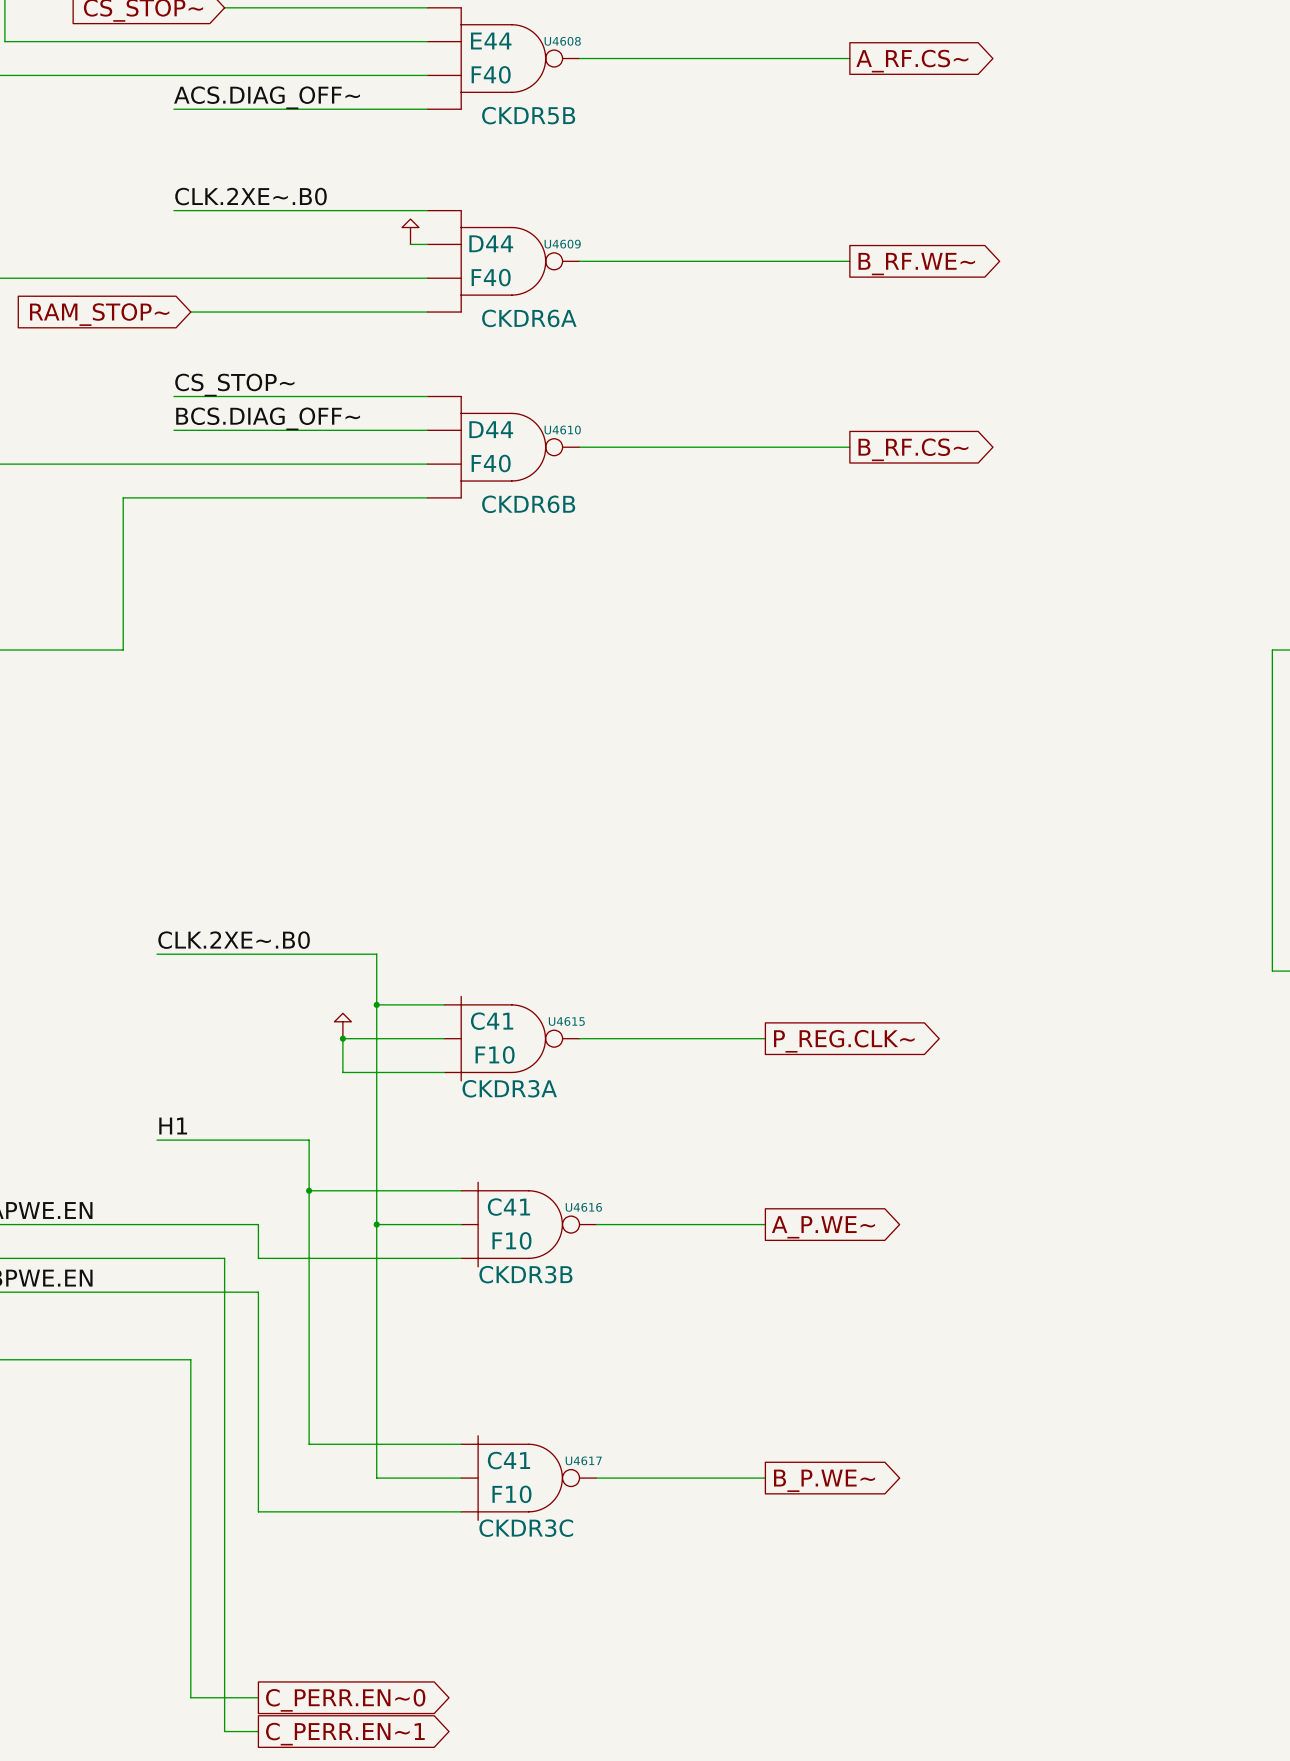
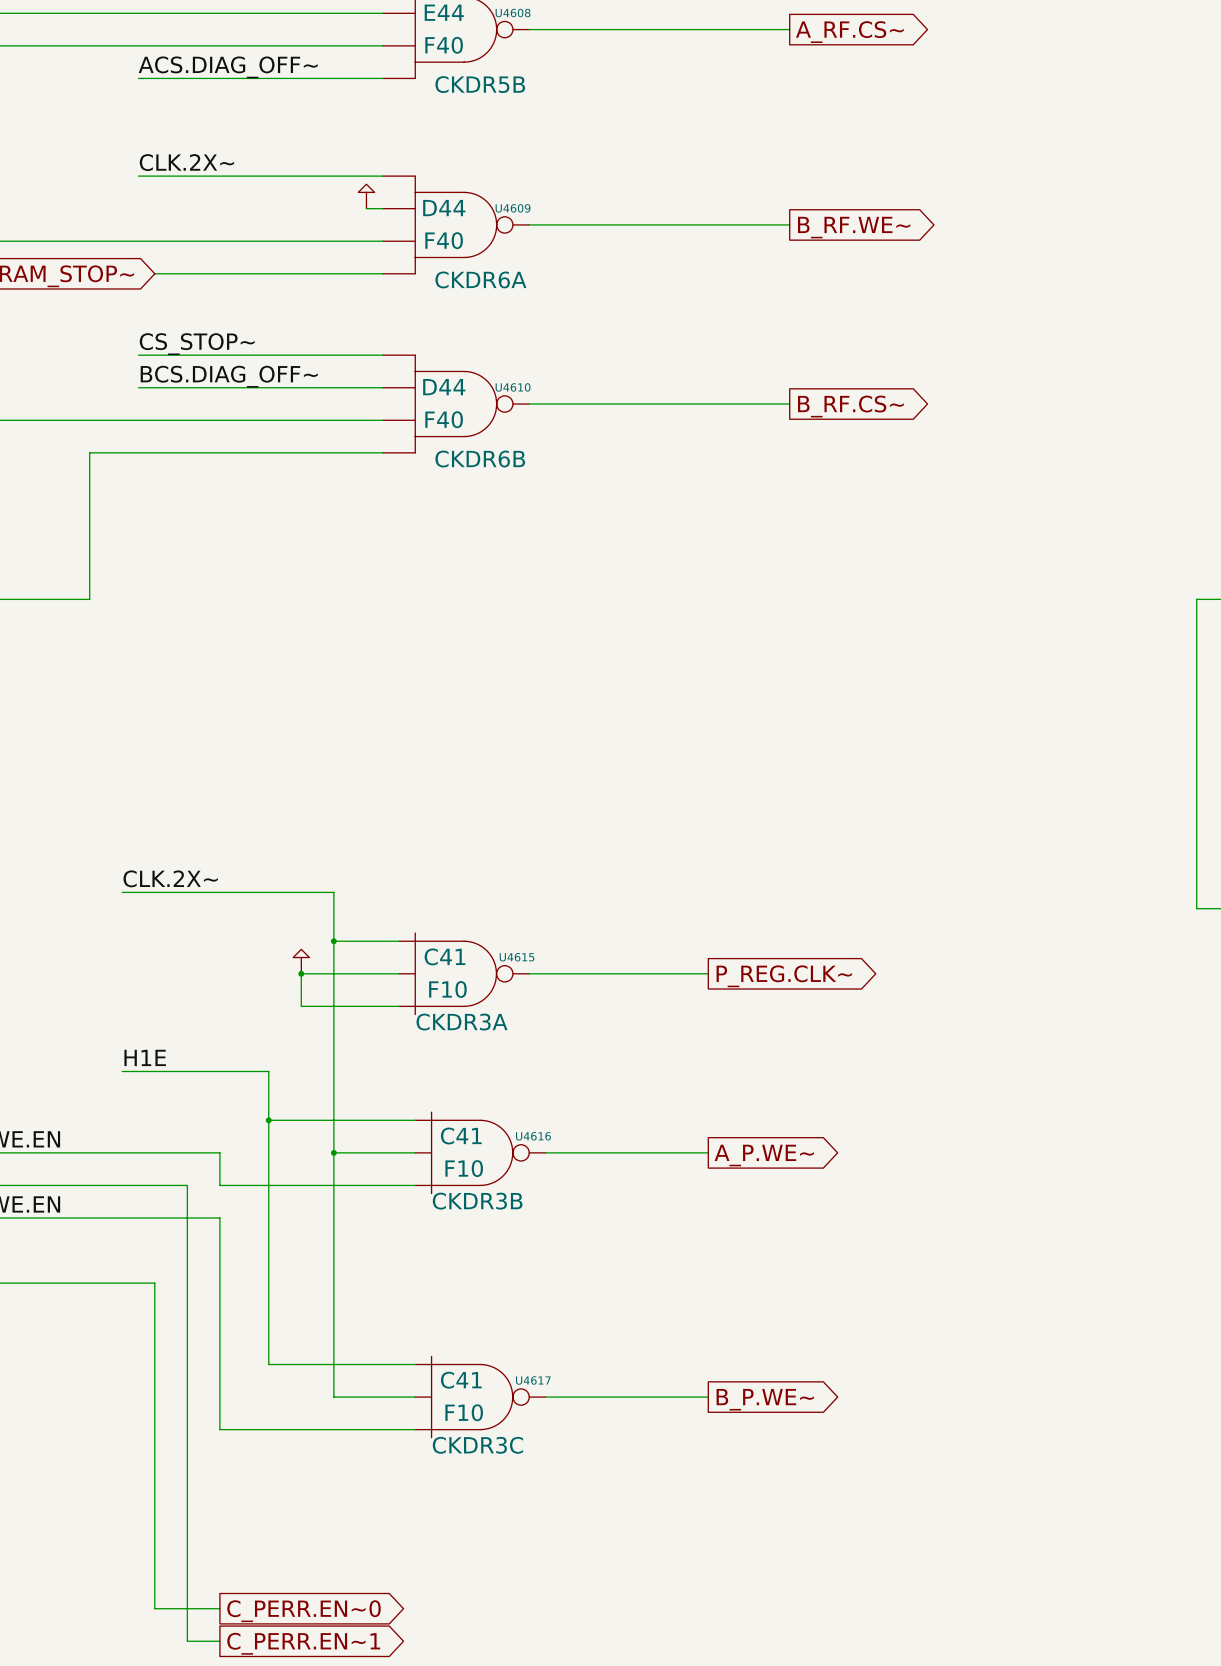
label: CLK.2XE~.B0 (250, 196) -> CLK.2X~ (186, 162)
label: CLK.2XE~.B0 (234, 940) -> CLK.2X~ (170, 878)
label: H1 (173, 1126) -> H1E (145, 1057)

